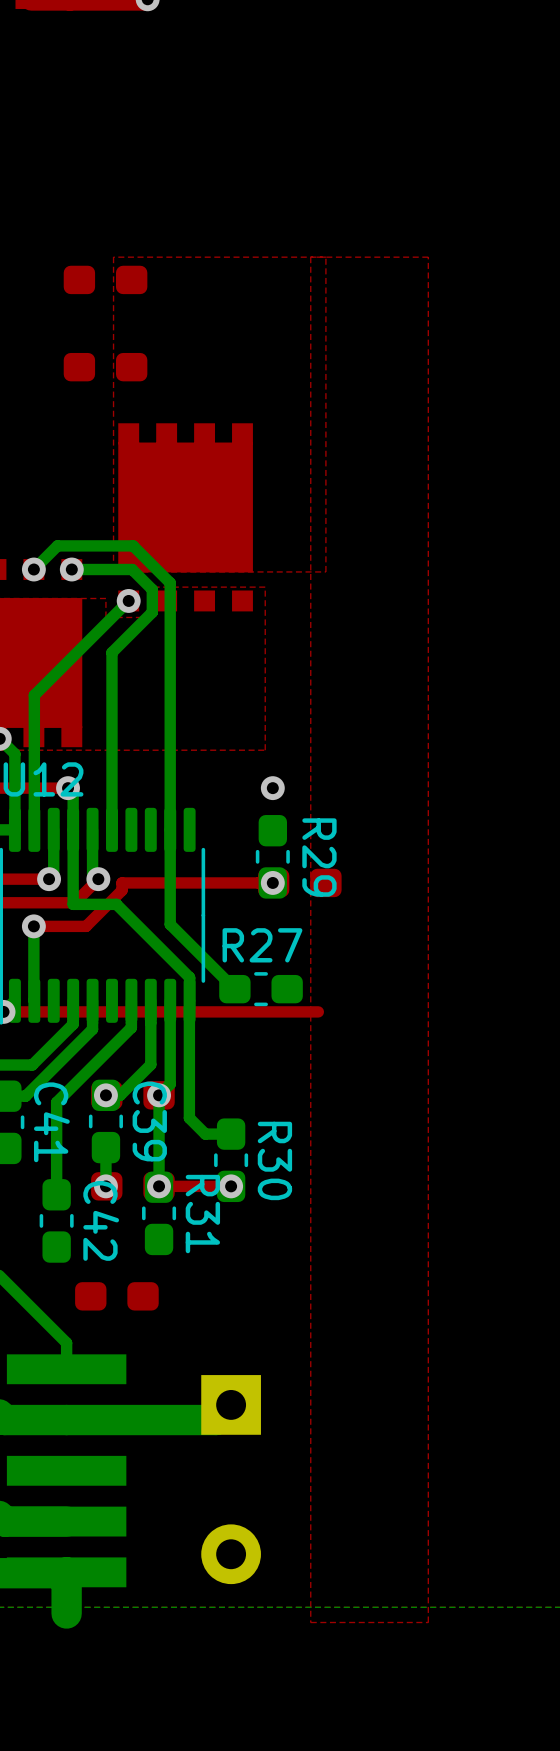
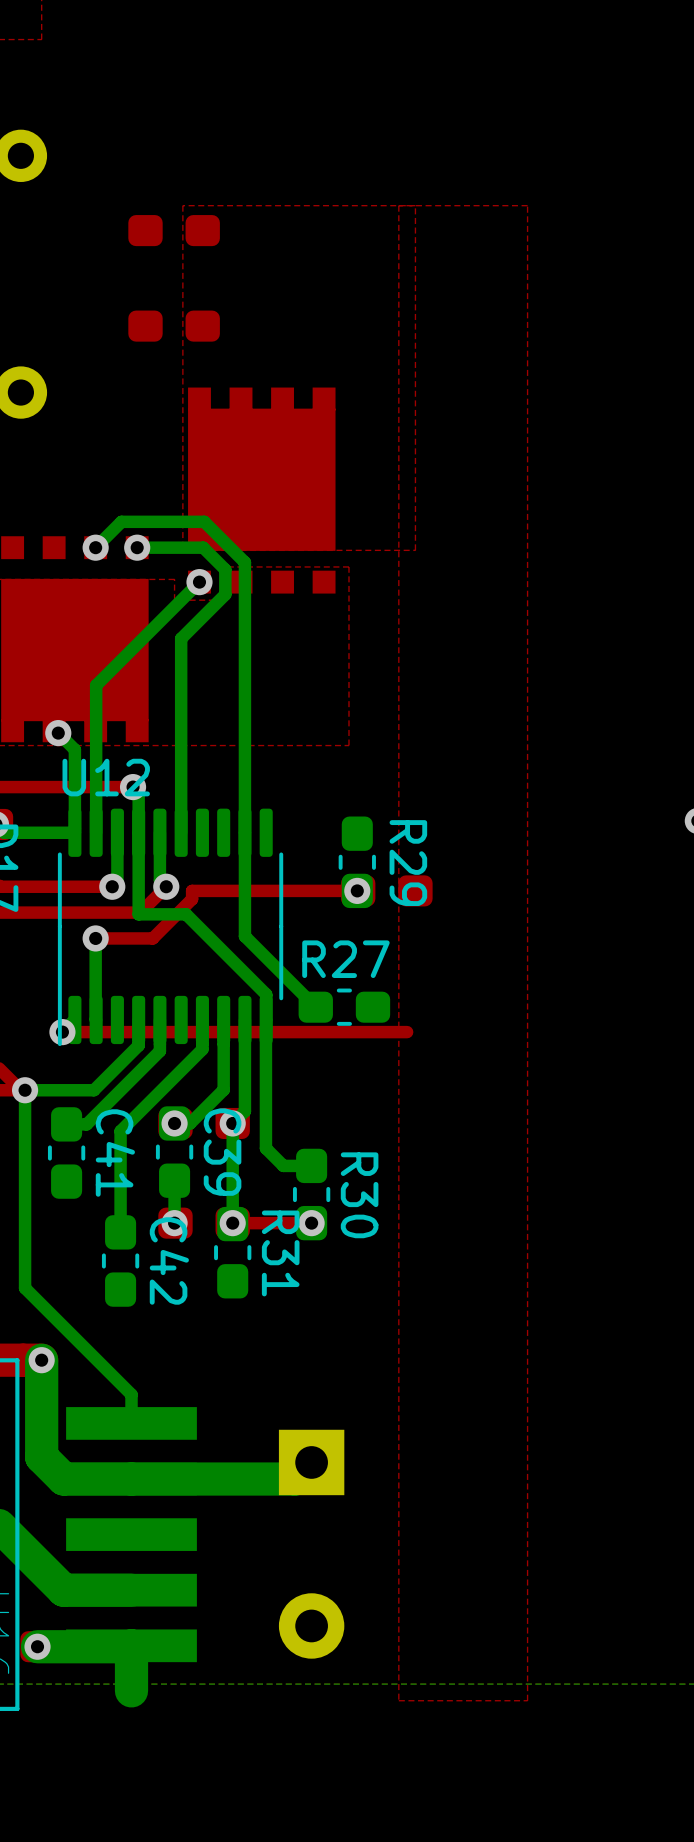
via: (272, 788) -> none
part: (116, 1296) -> none

